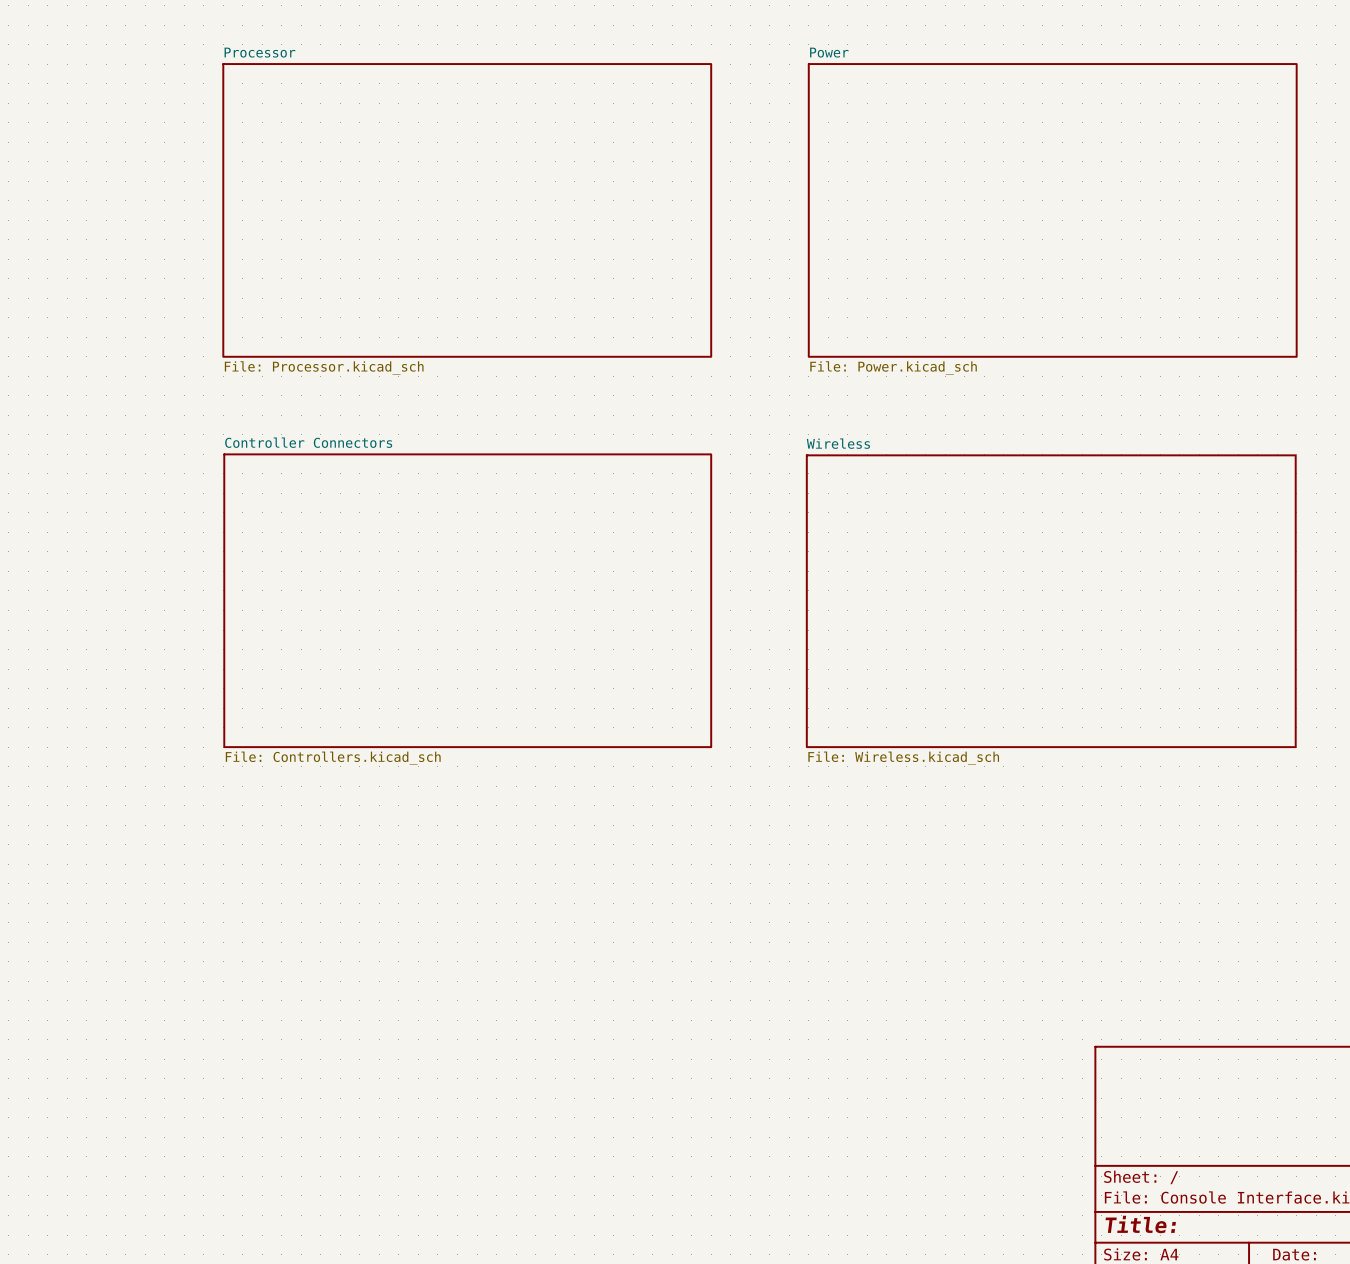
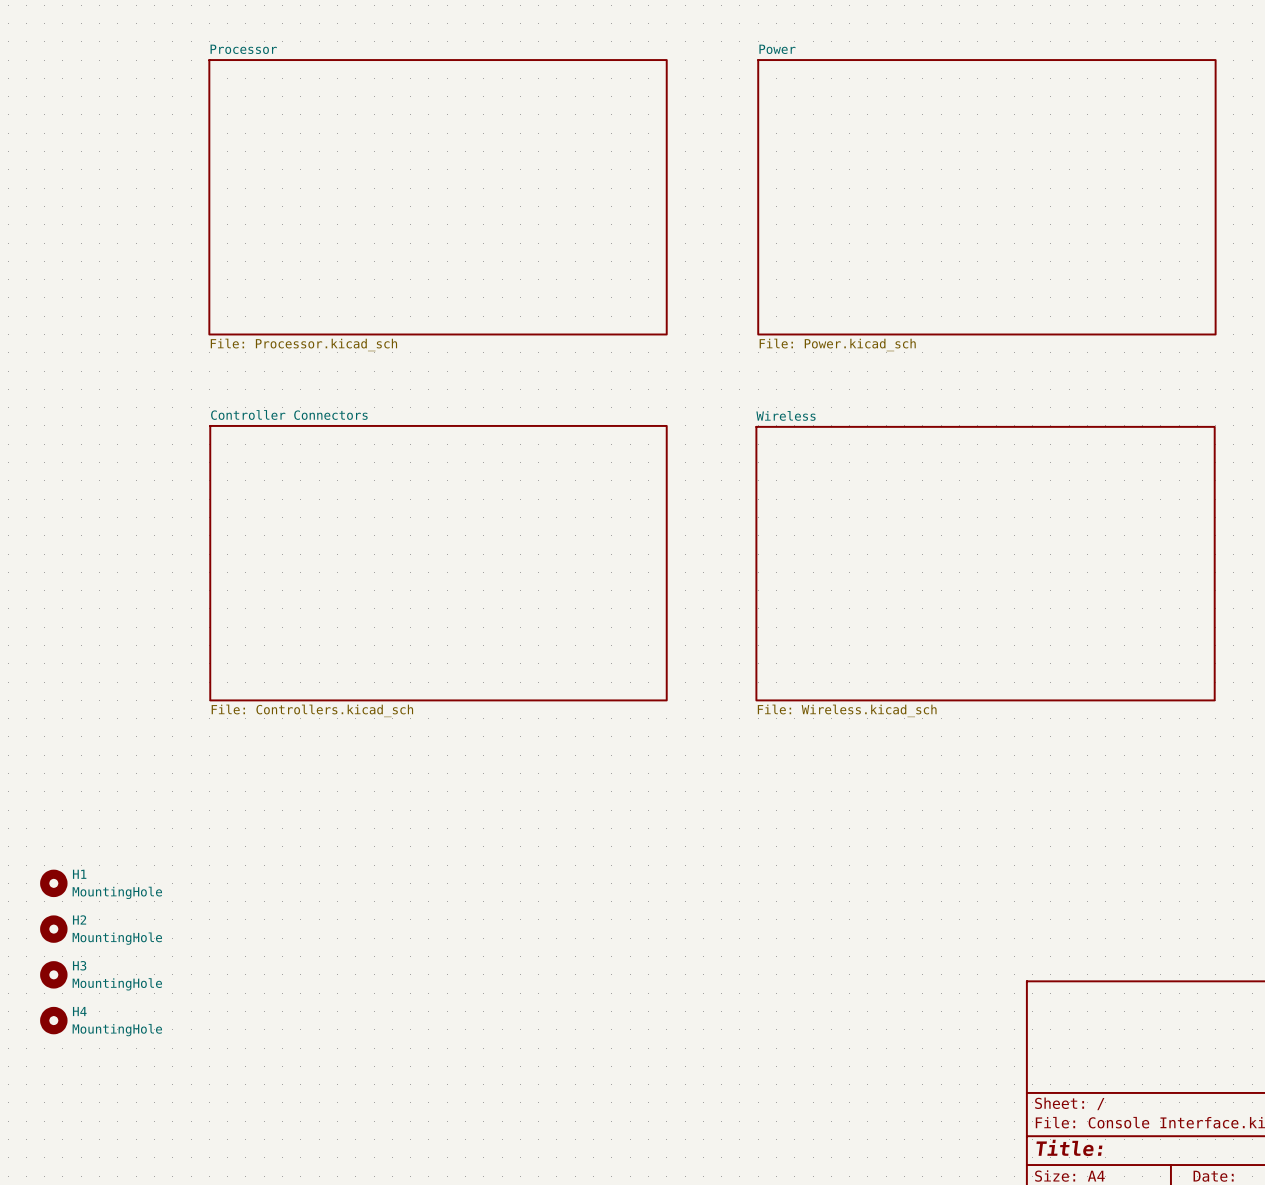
H1: none -> MountingHole (53, 883)
H2: none -> MountingHole (53, 929)
H3: none -> MountingHole (53, 974)
H4: none -> MountingHole (53, 1020)

